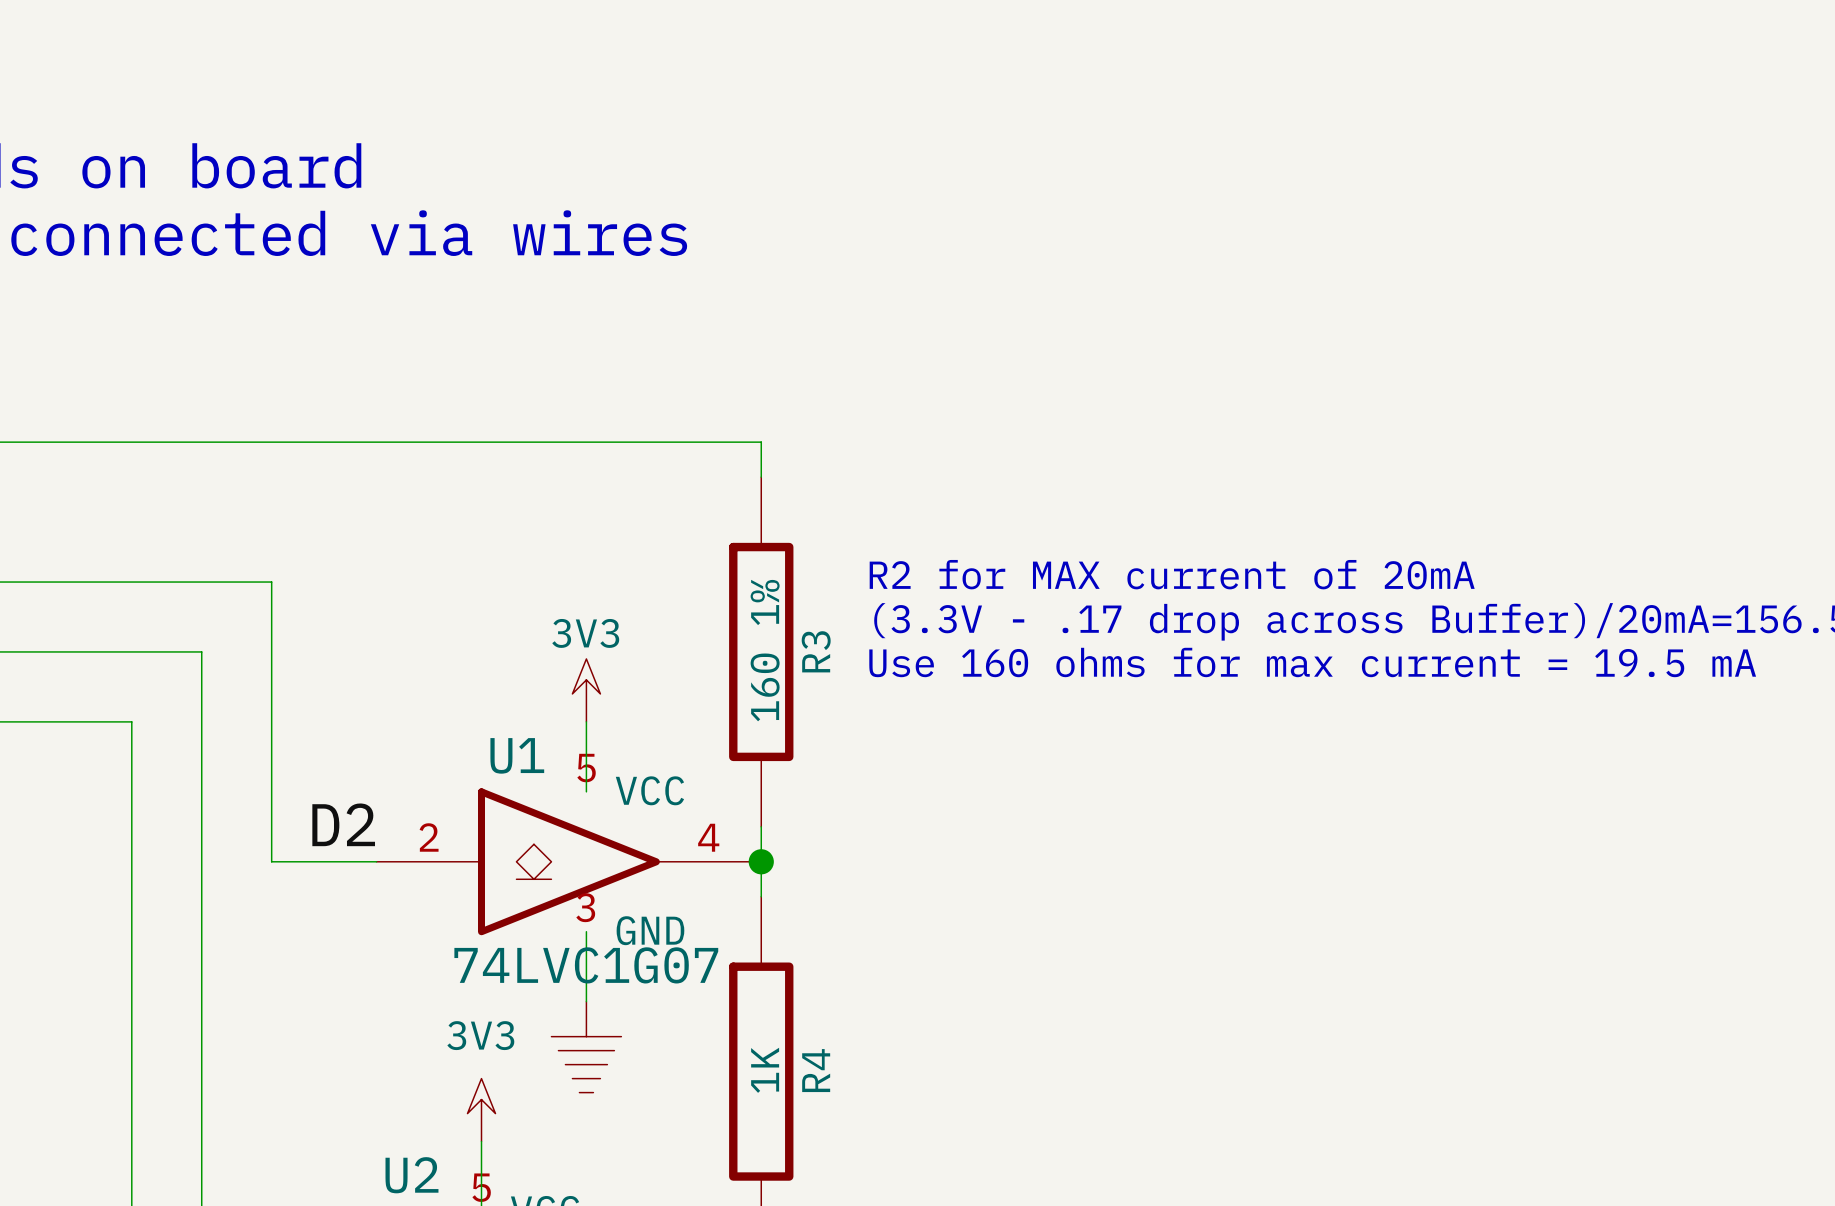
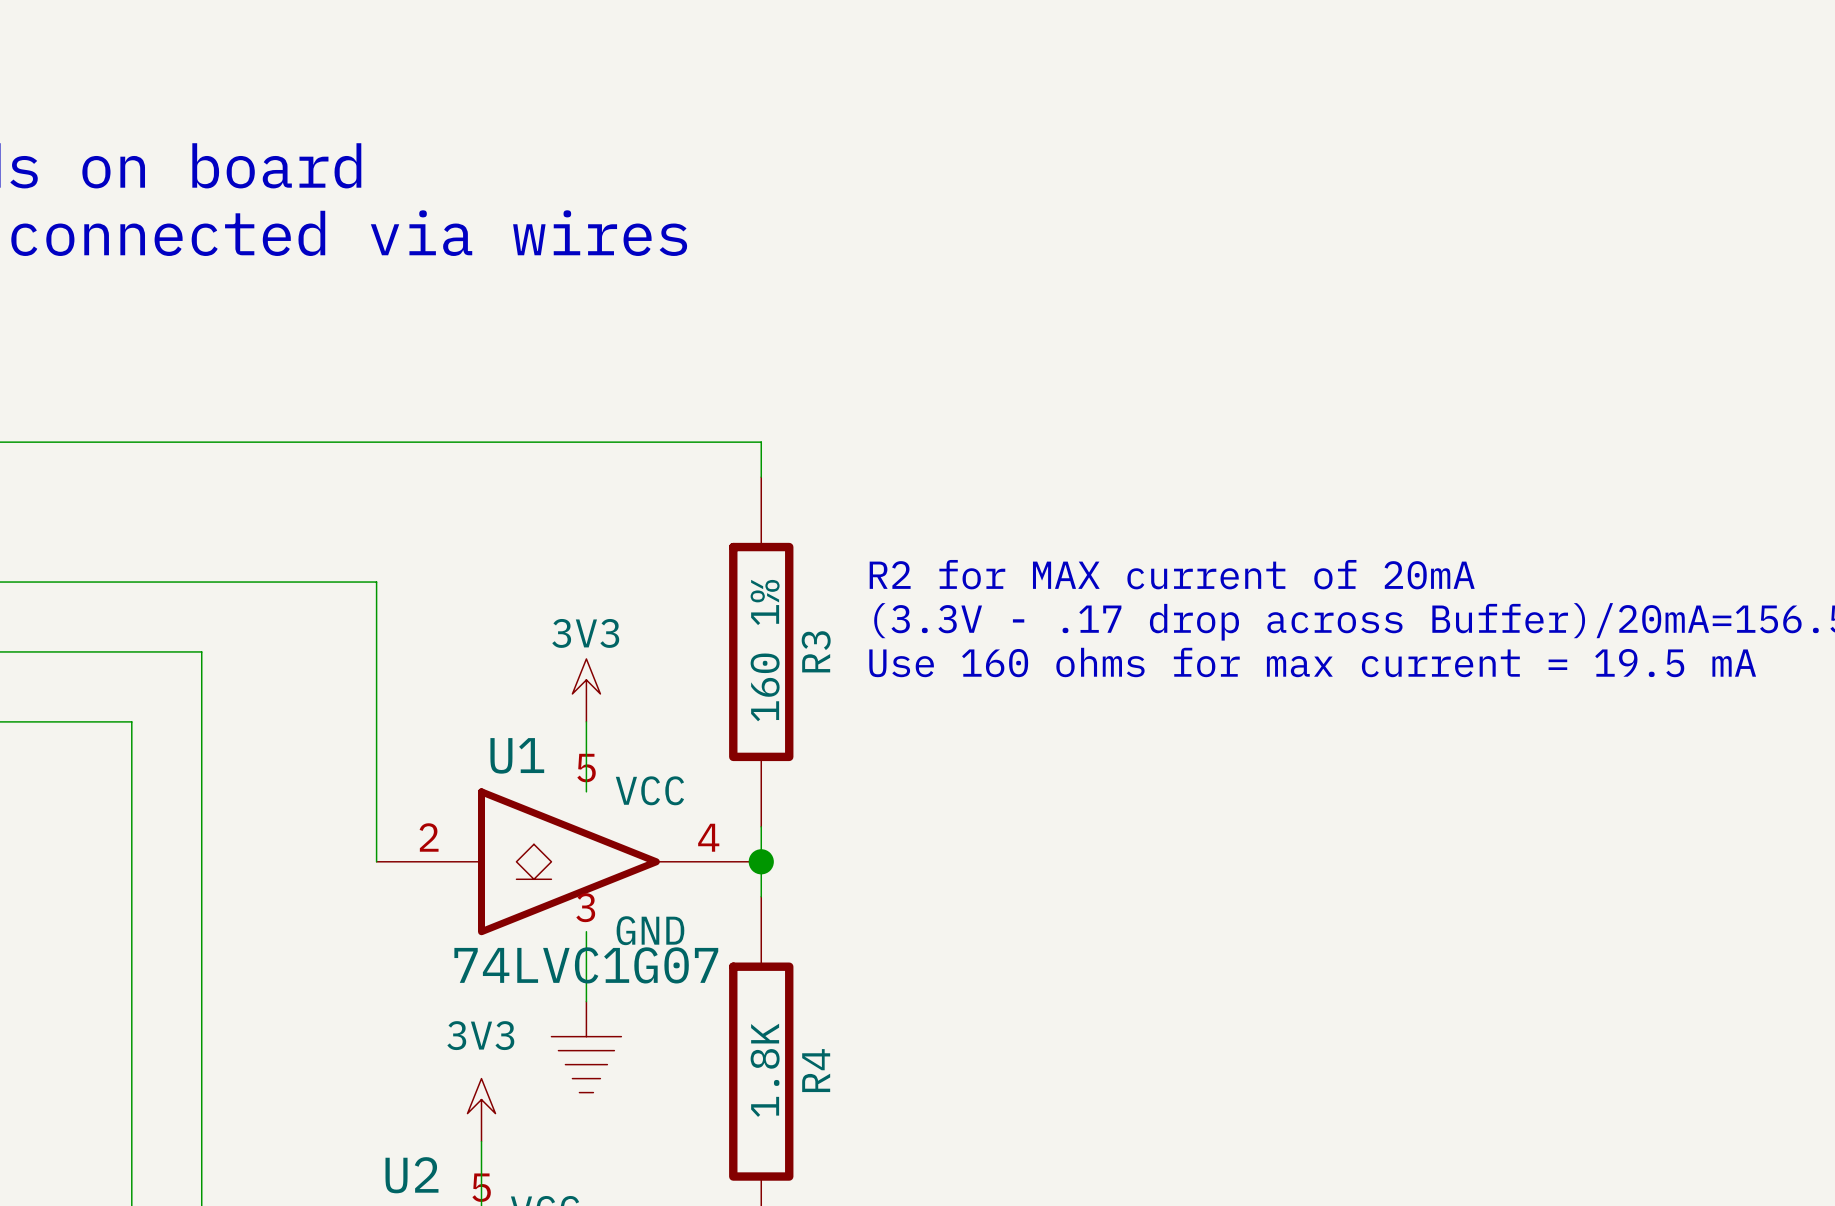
wire: (271, 582) (271, 861) (376, 861) -> (271, 582) (376, 582) (376, 861)
label: D2 (343, 824) -> none
R4 value: 1K (765, 1070) -> 1.8K (765, 1070)

